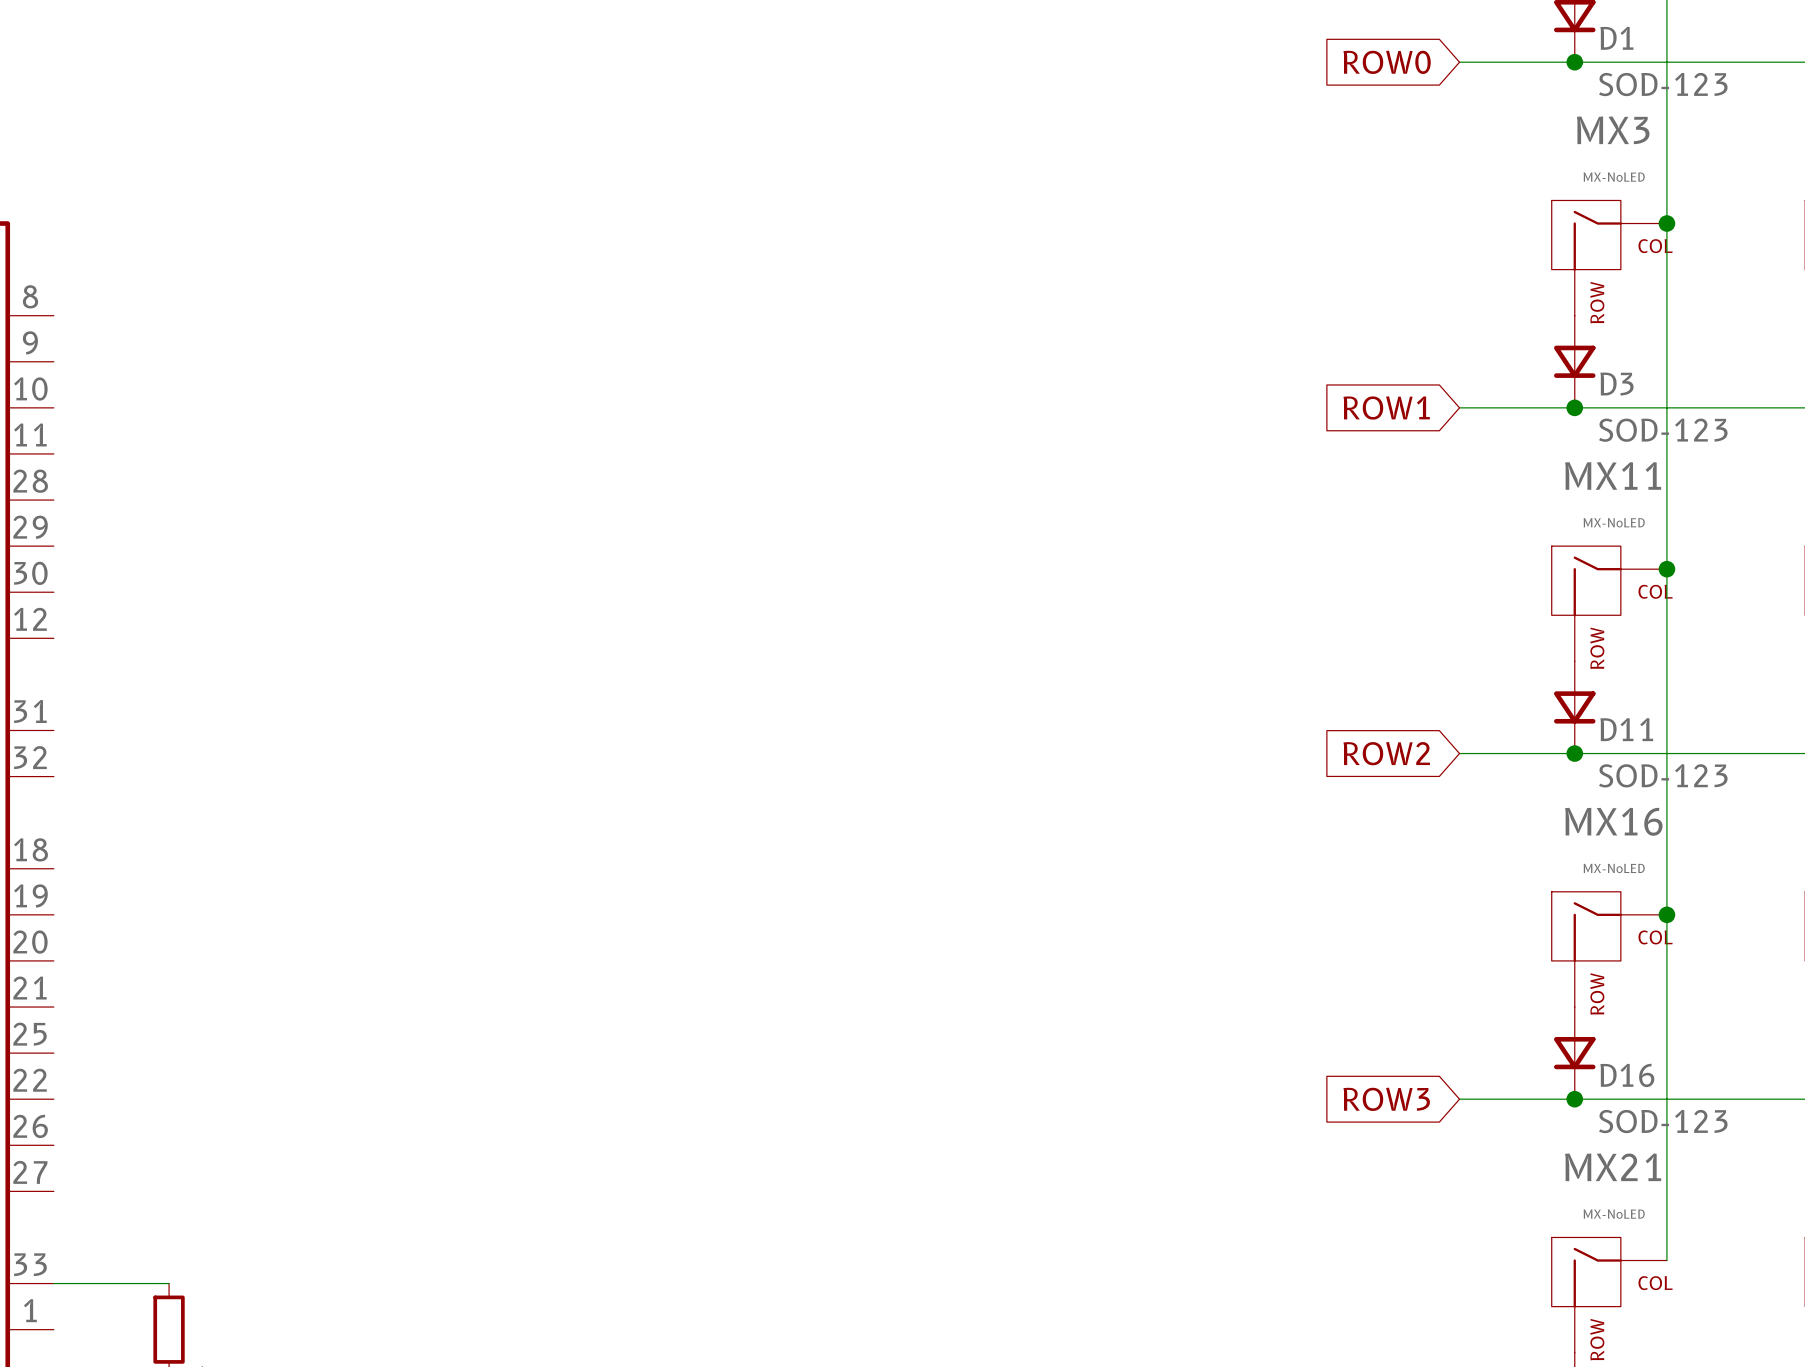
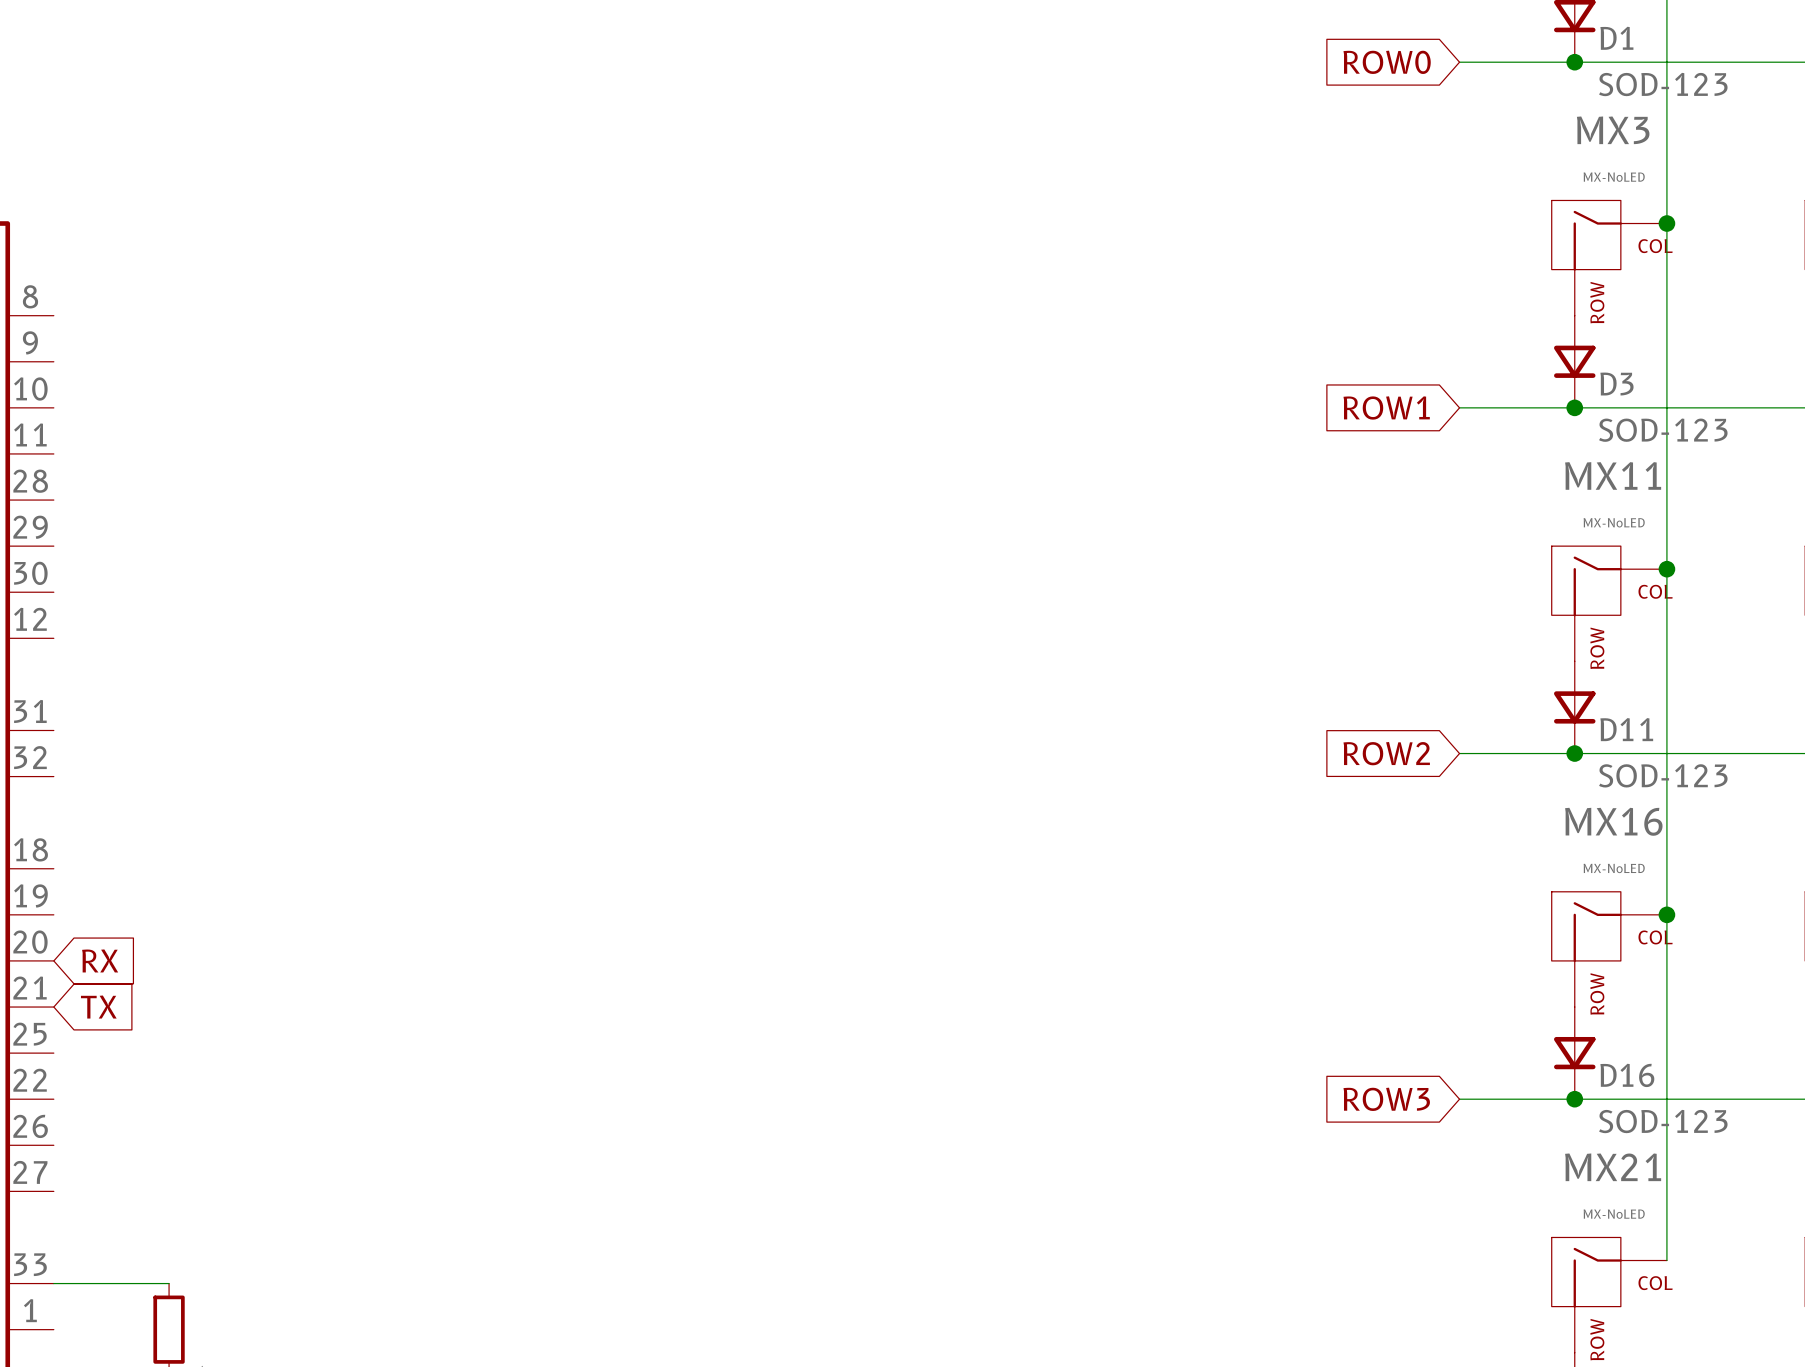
global label: none -> RX (100, 960)
global label: none -> TX (98, 1007)

